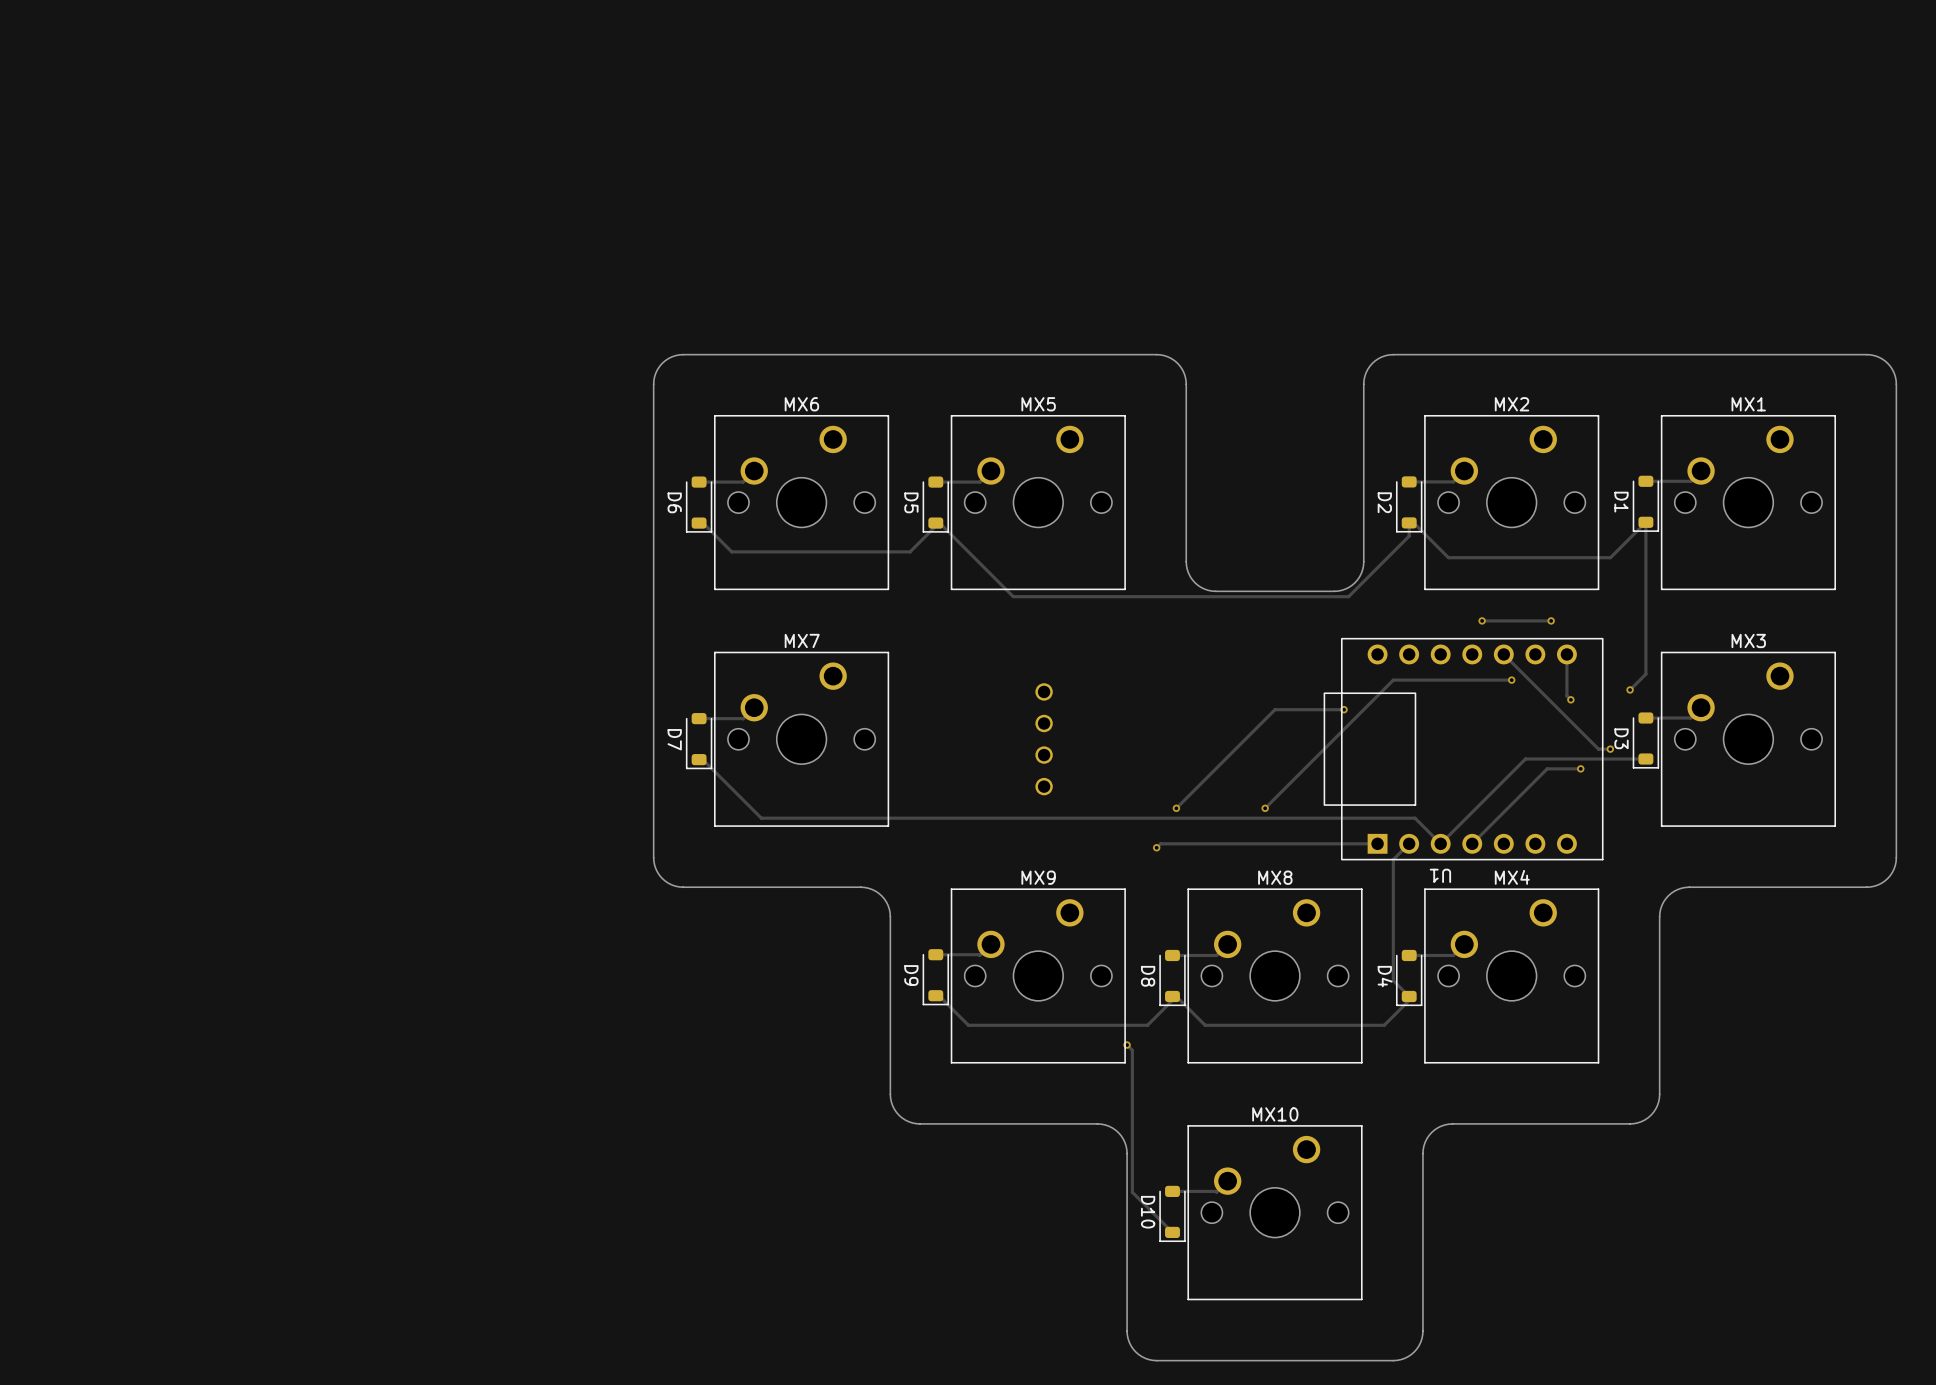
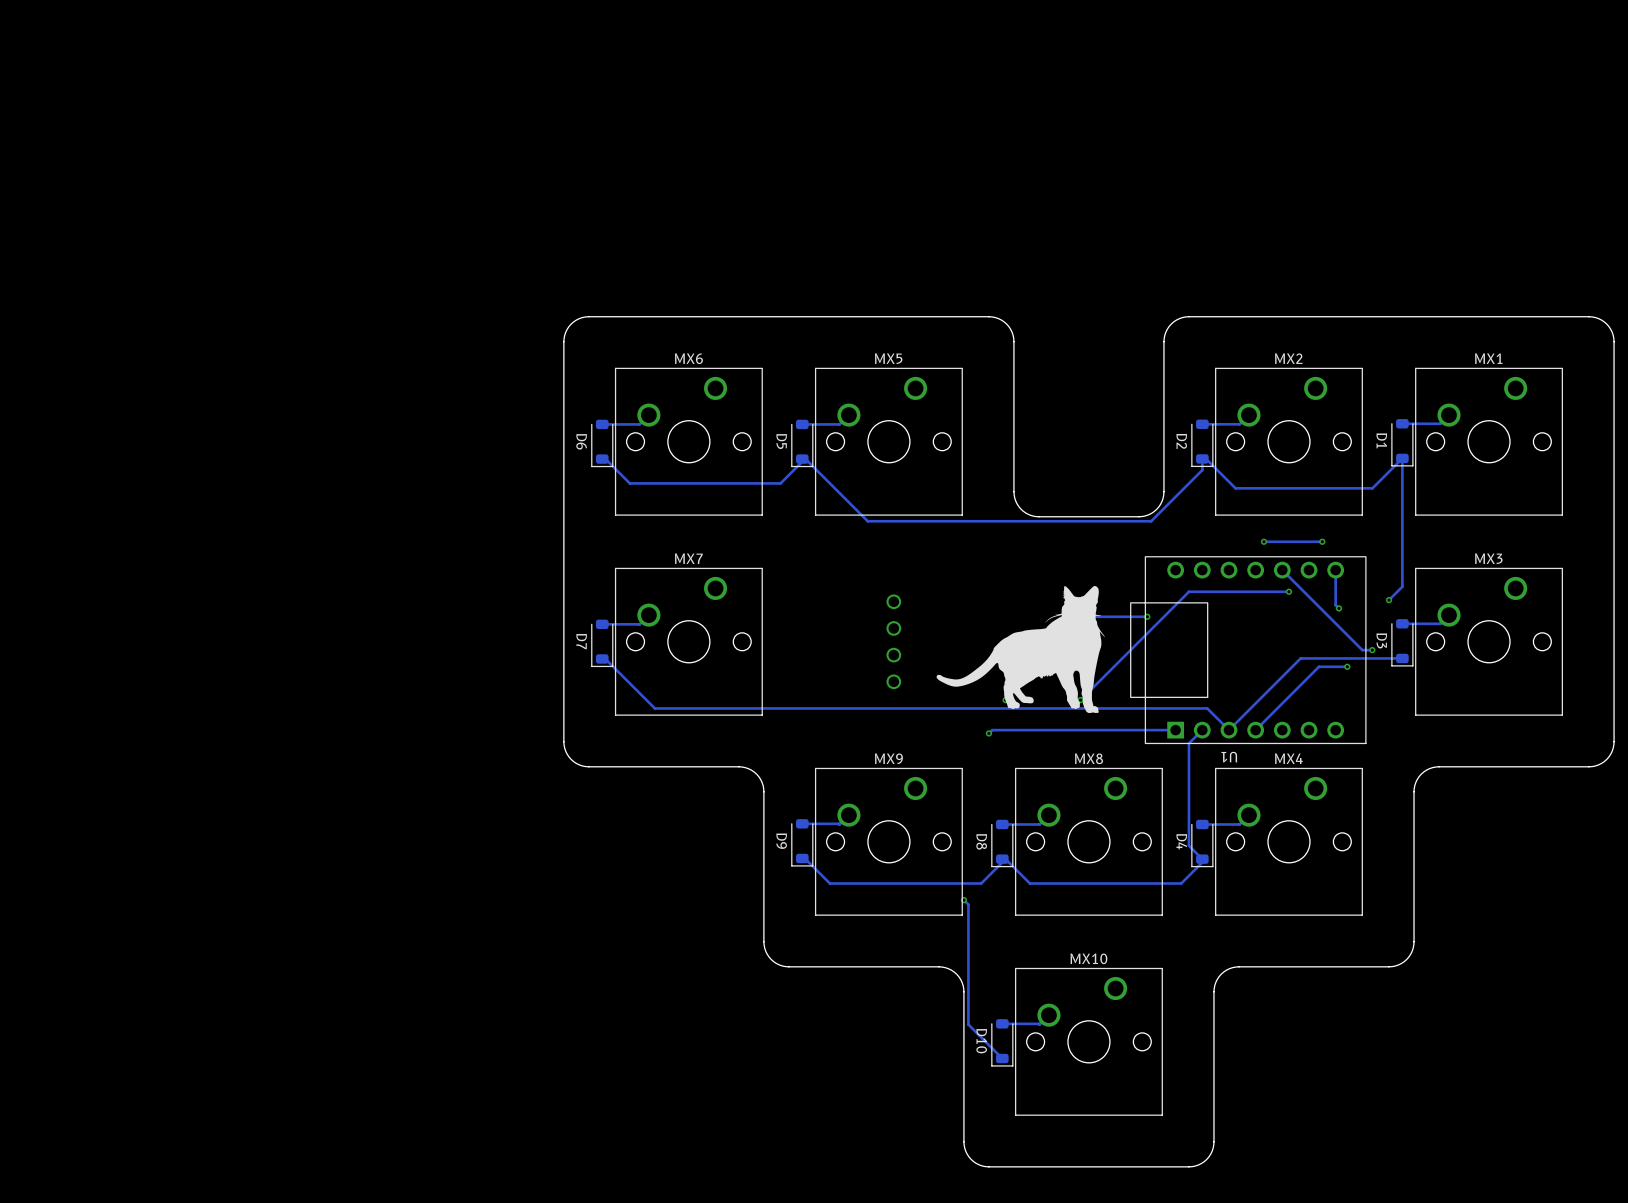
part: none -> (1020, 649)

